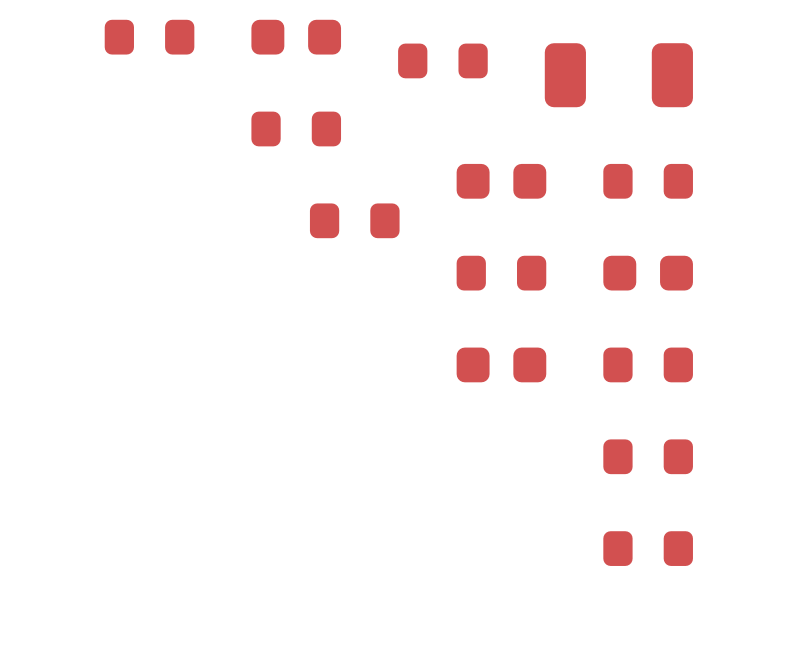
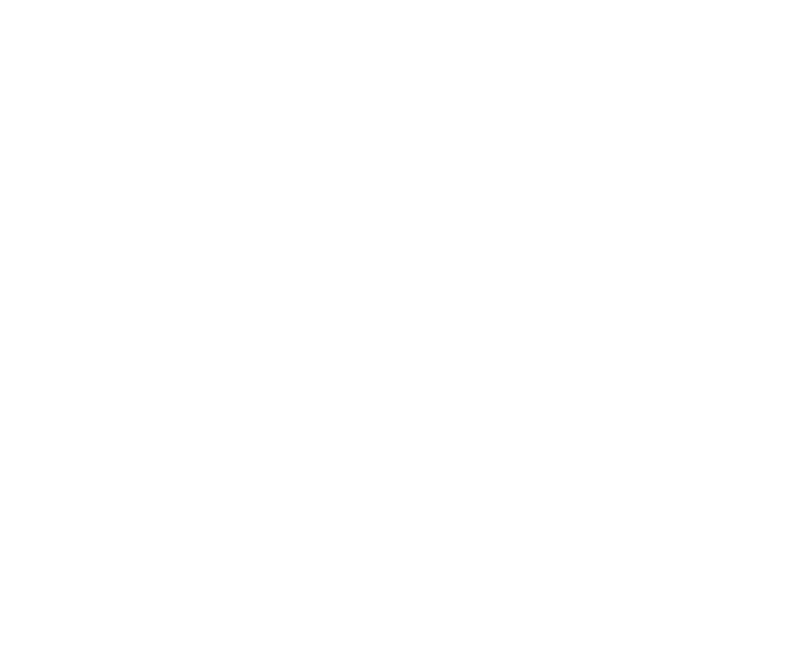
part: (149, 37) -> none
part: (296, 37) -> none
part: (442, 60) -> none
part: (618, 75) -> none
part: (296, 128) -> none
part: (501, 181) -> none
part: (648, 181) -> none
part: (354, 220) -> none
part: (501, 273) -> none
part: (648, 273) -> none
part: (501, 364) -> none
part: (648, 364) -> none
part: (648, 456) -> none
part: (648, 548) -> none

